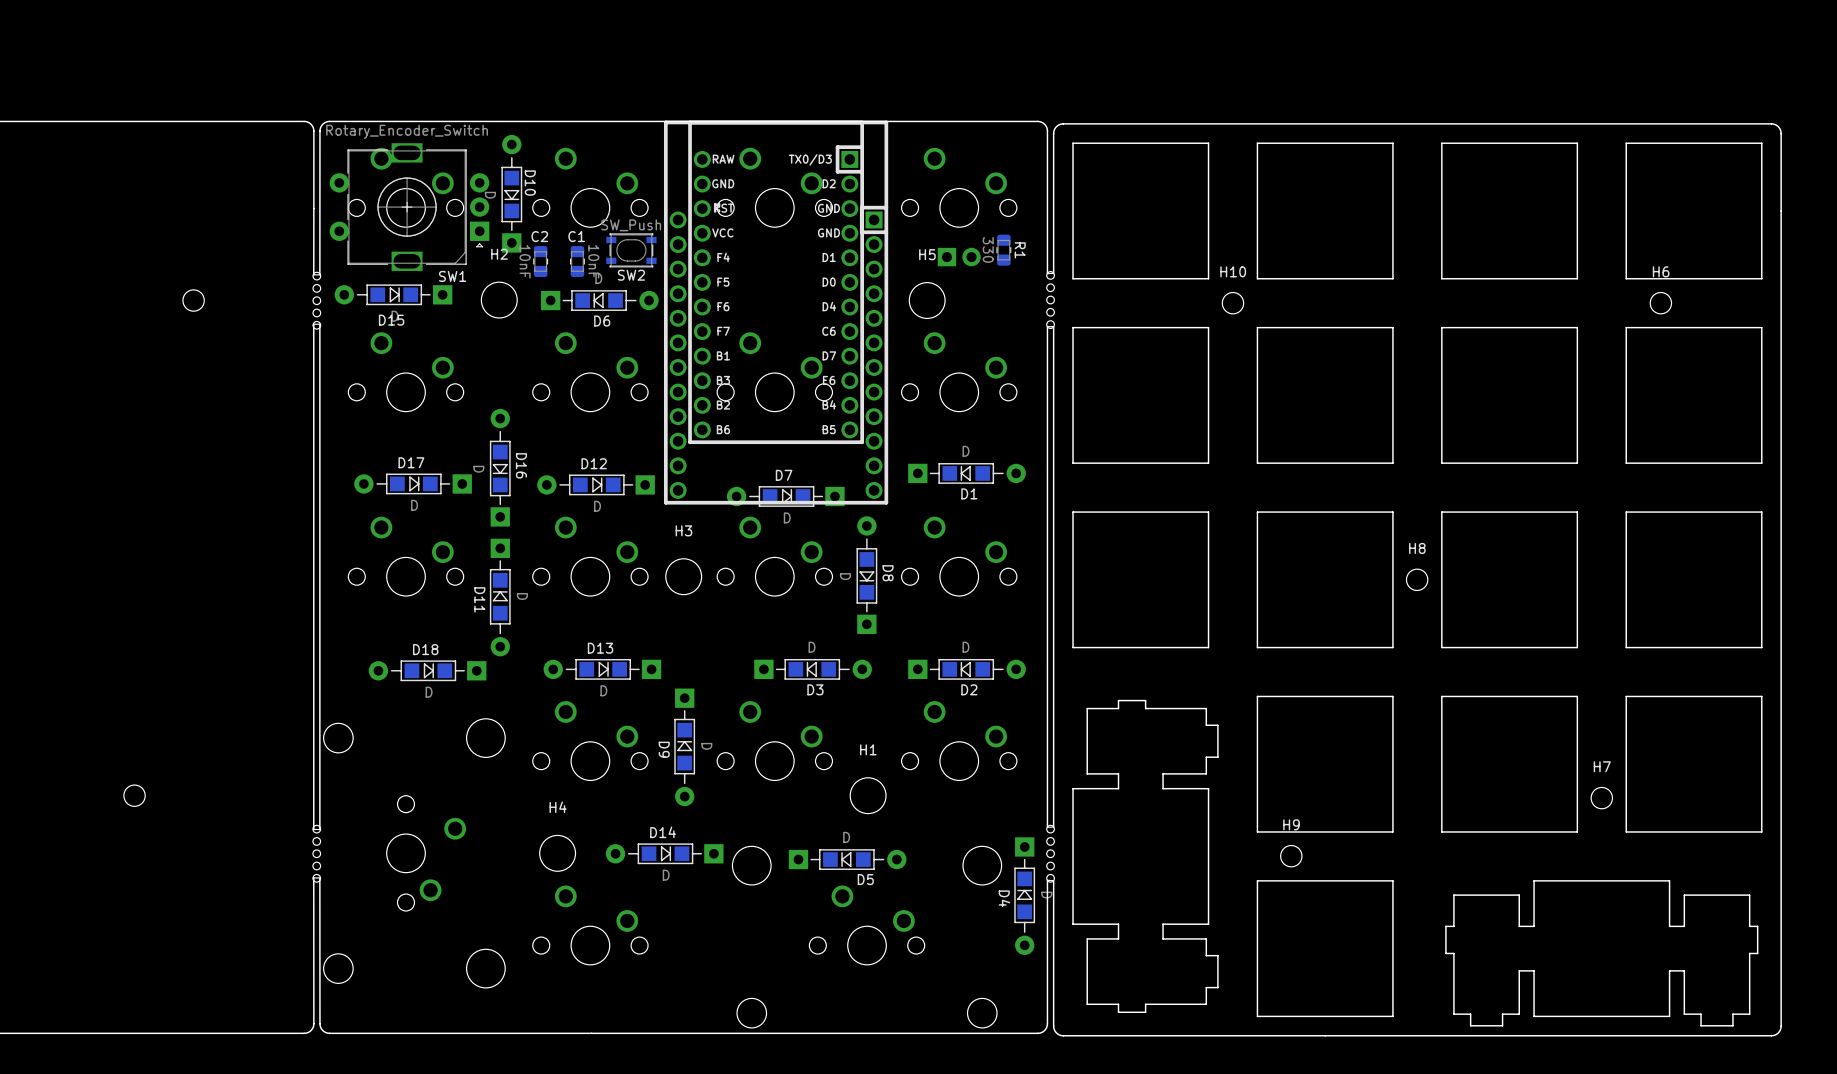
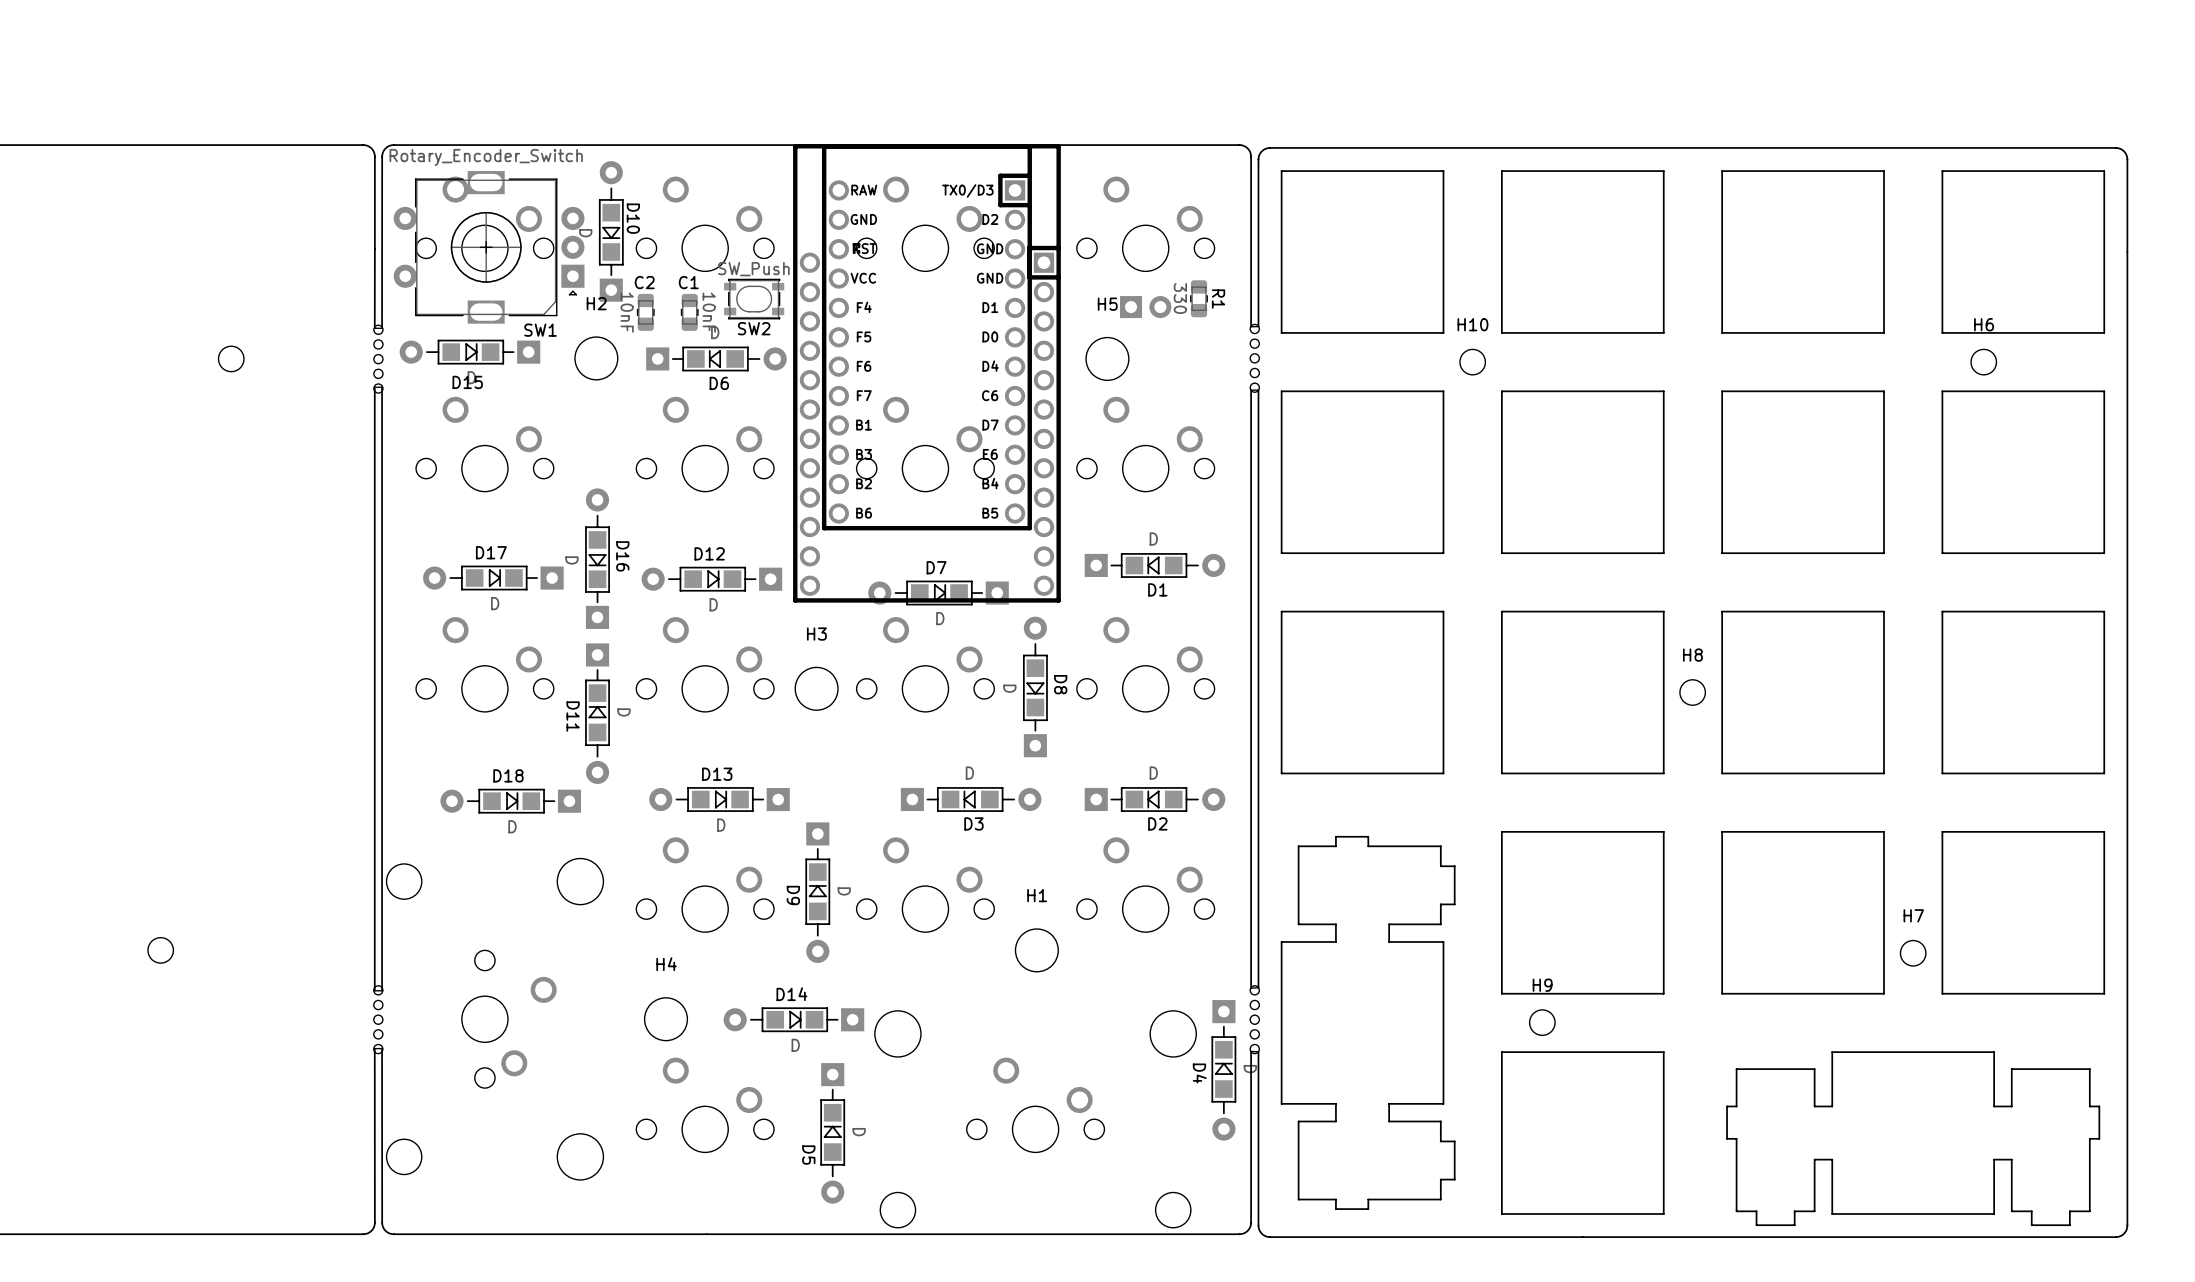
D5 rotation: 0° (847, 859) -> 90° clockwise (832, 1133)
D5 position: (847, 859) -> (832, 1133)

